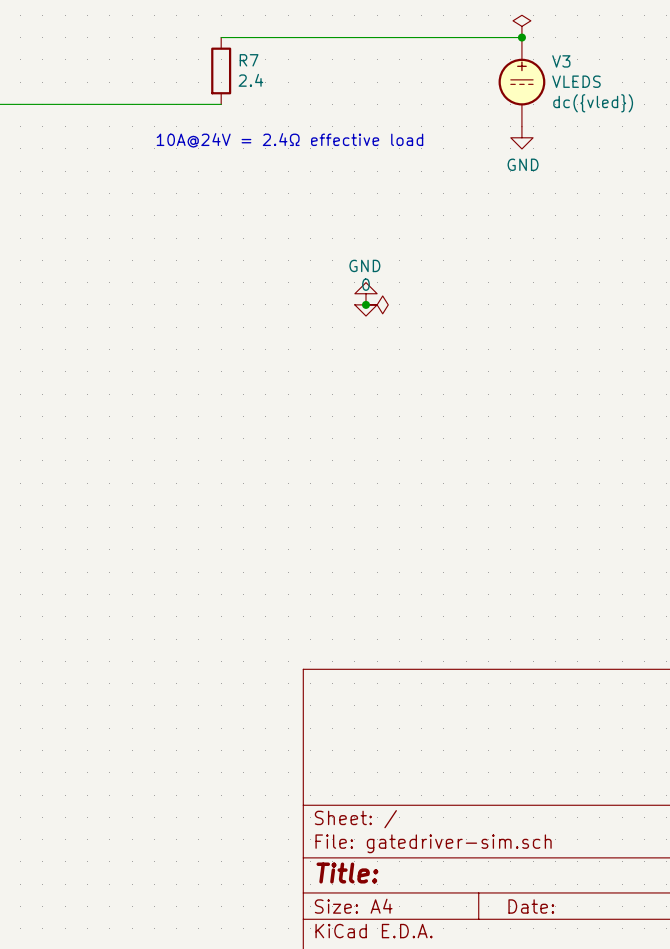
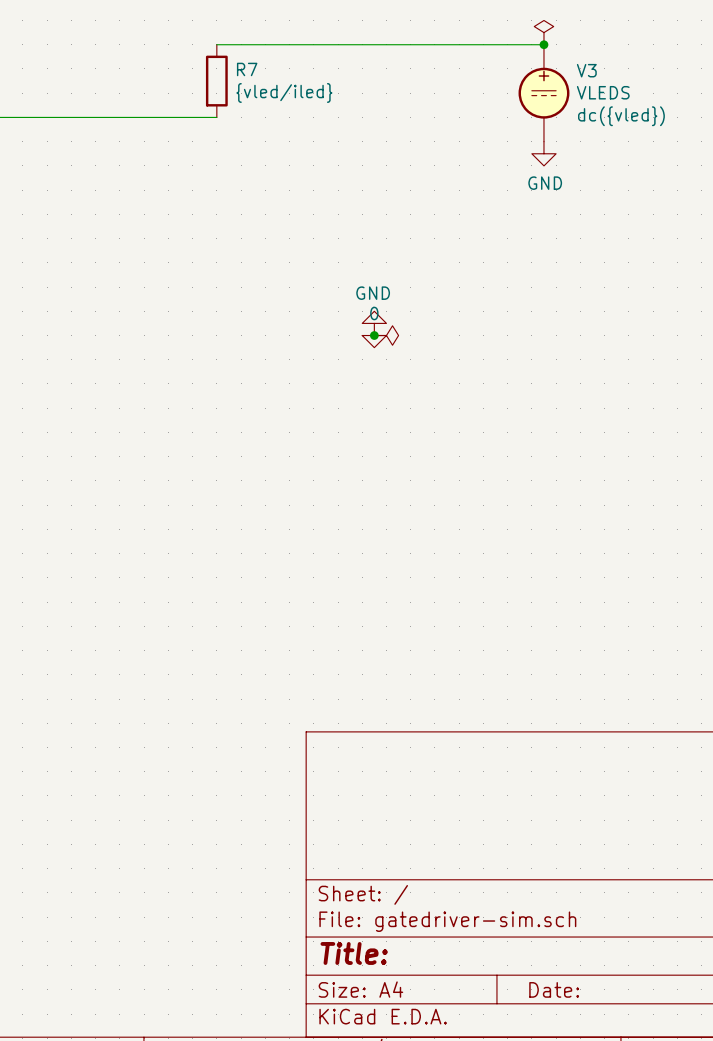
R7 value: 2.4 (250, 80) -> {vled/iled} (284, 92)
text: 10A@24V = 2.4Ω effective load (289, 140) -> none

